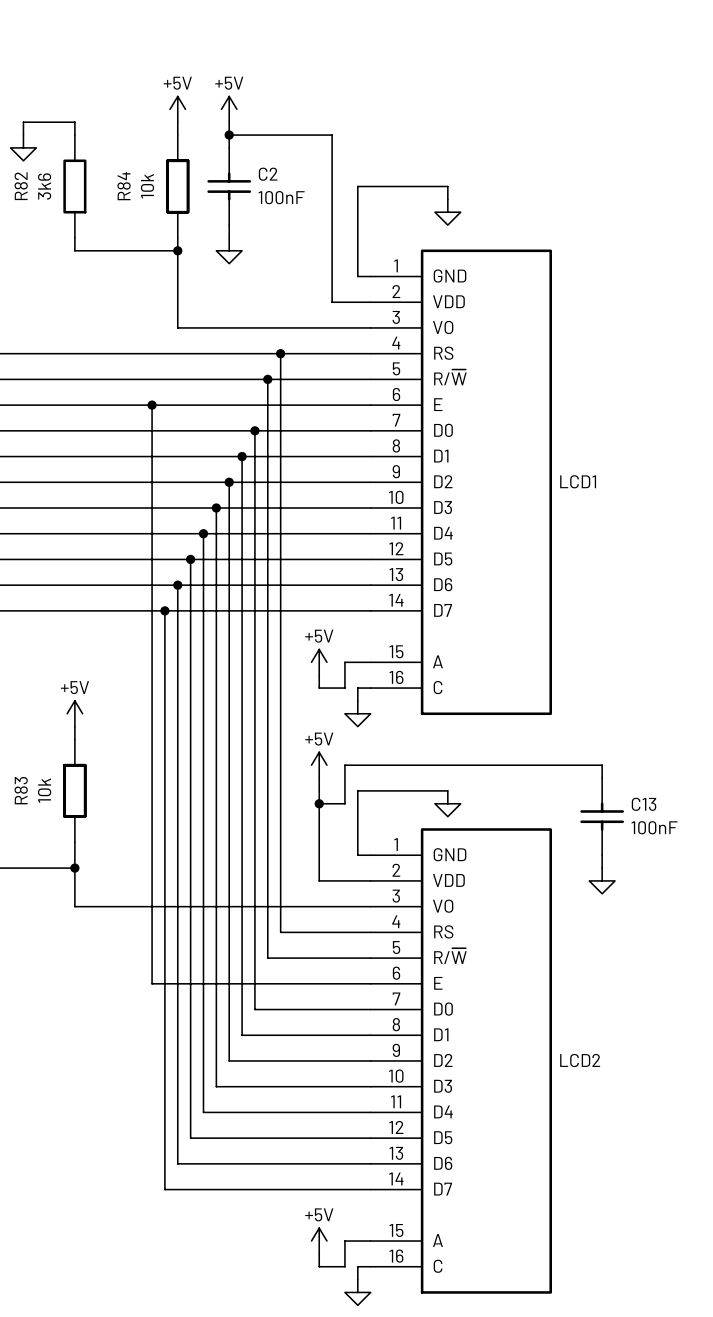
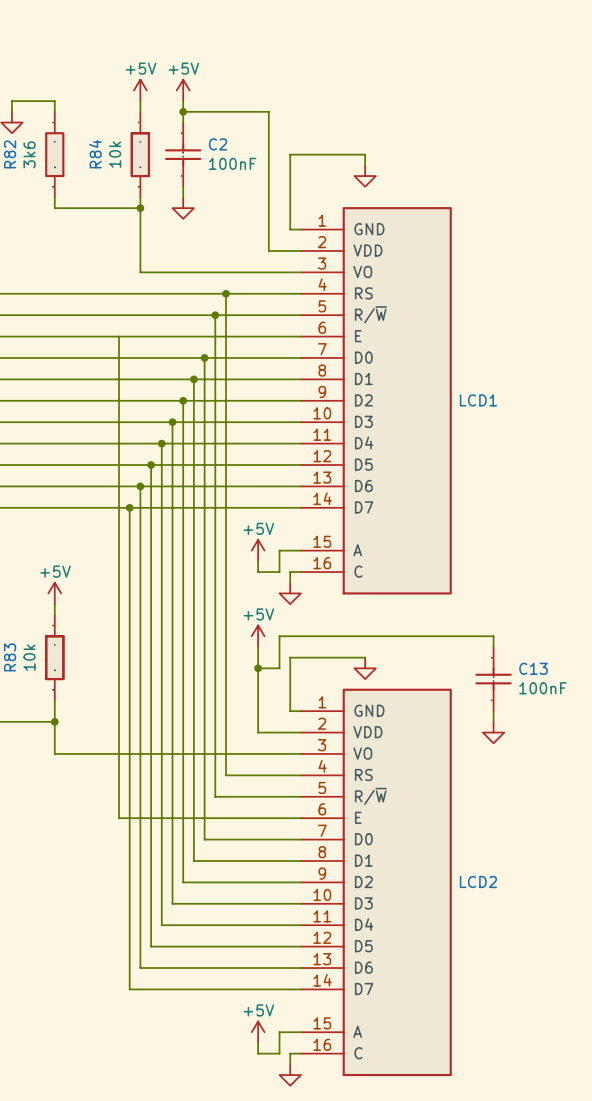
junction: (152, 405) -> none

